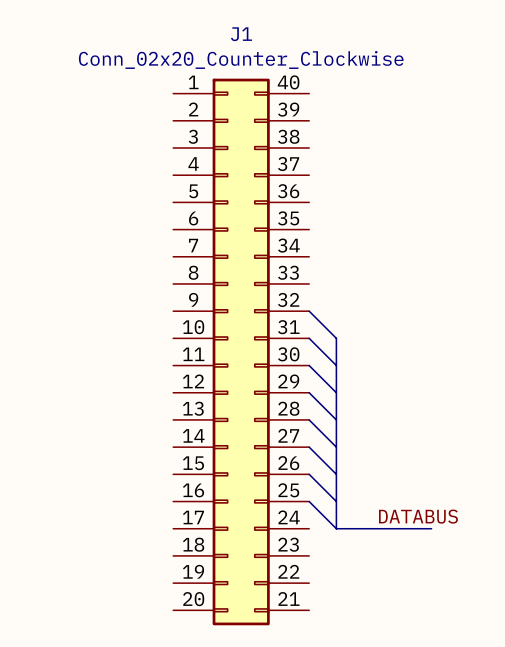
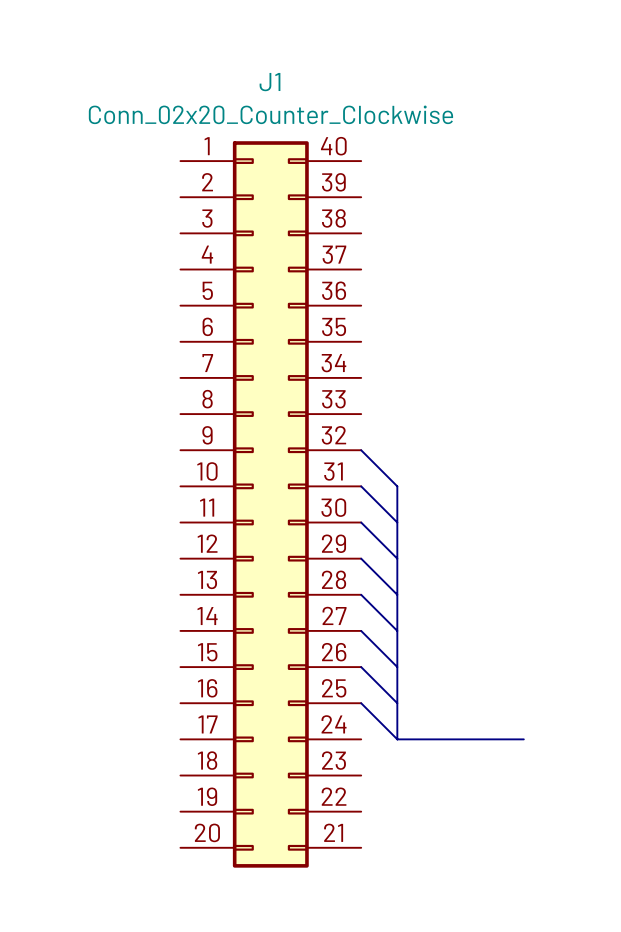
label: DATABUS (418, 516) -> none

